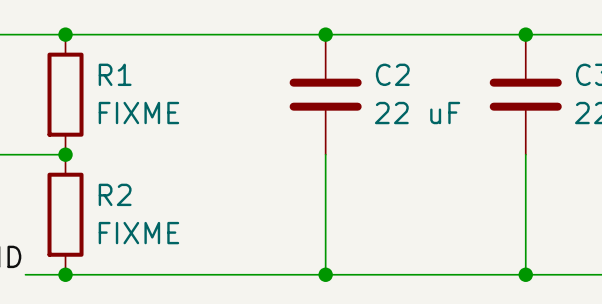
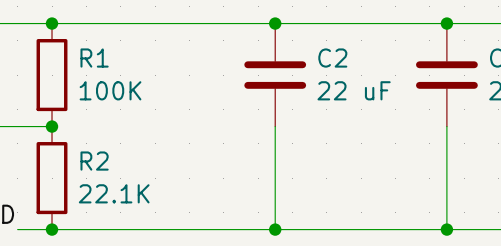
R1 value: FIXME (138, 113) -> 100K (110, 90)
R2 value: FIXME (138, 233) -> 22.1K (114, 193)

